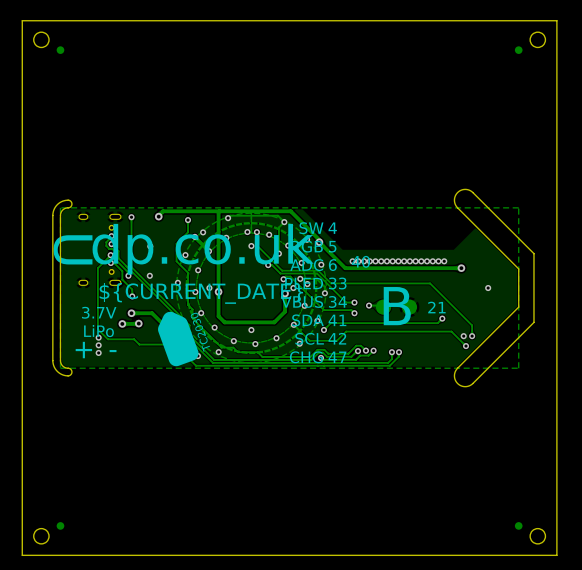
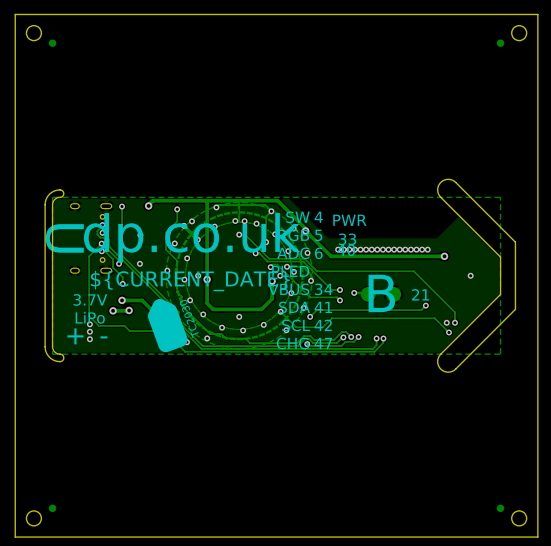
text: none -> PWR (349, 220)
text position: 33 (337, 283) -> 33 (347, 239)

